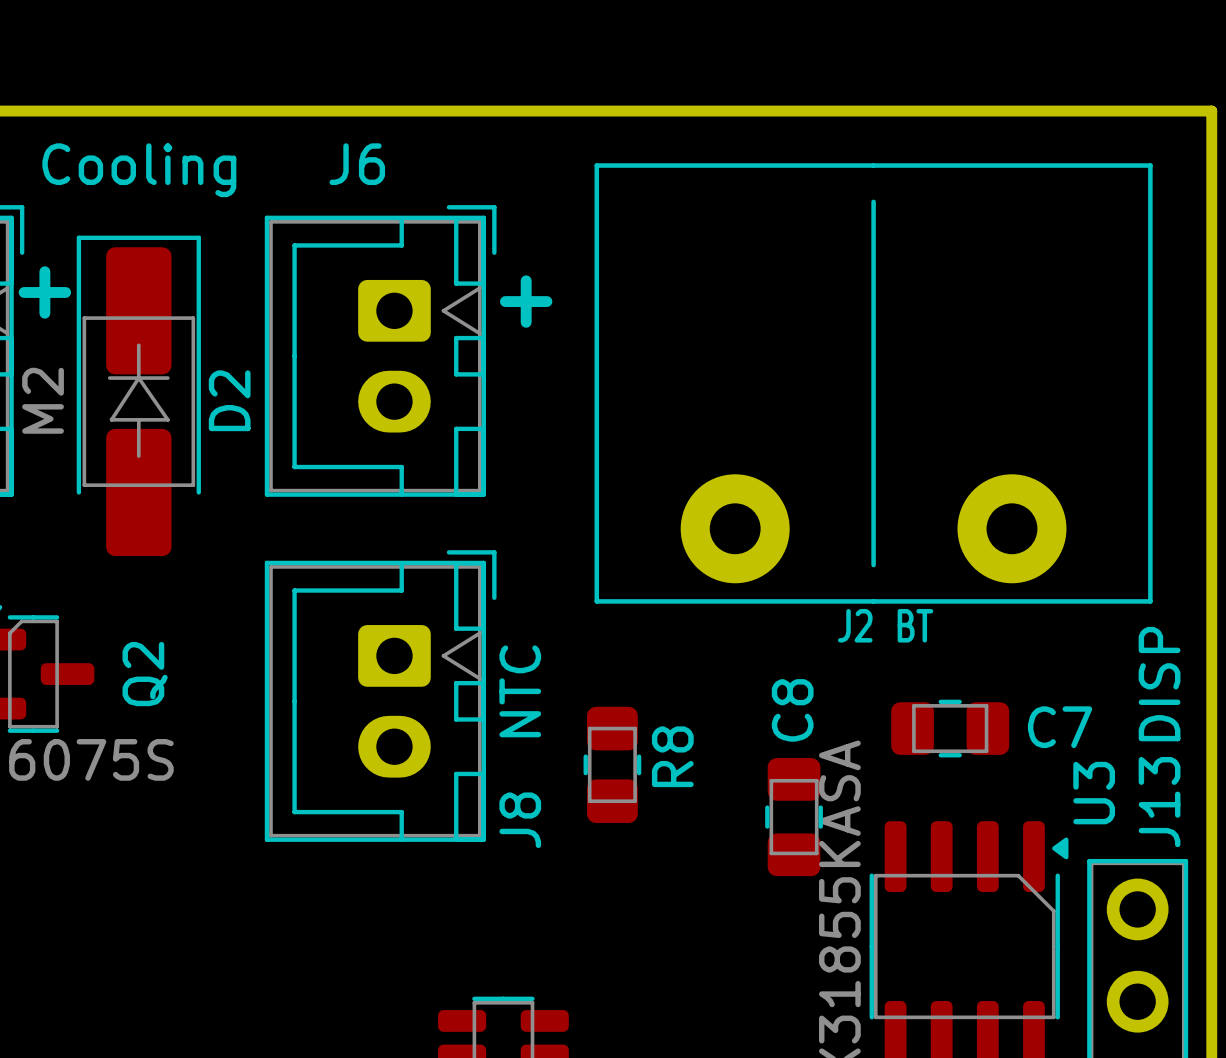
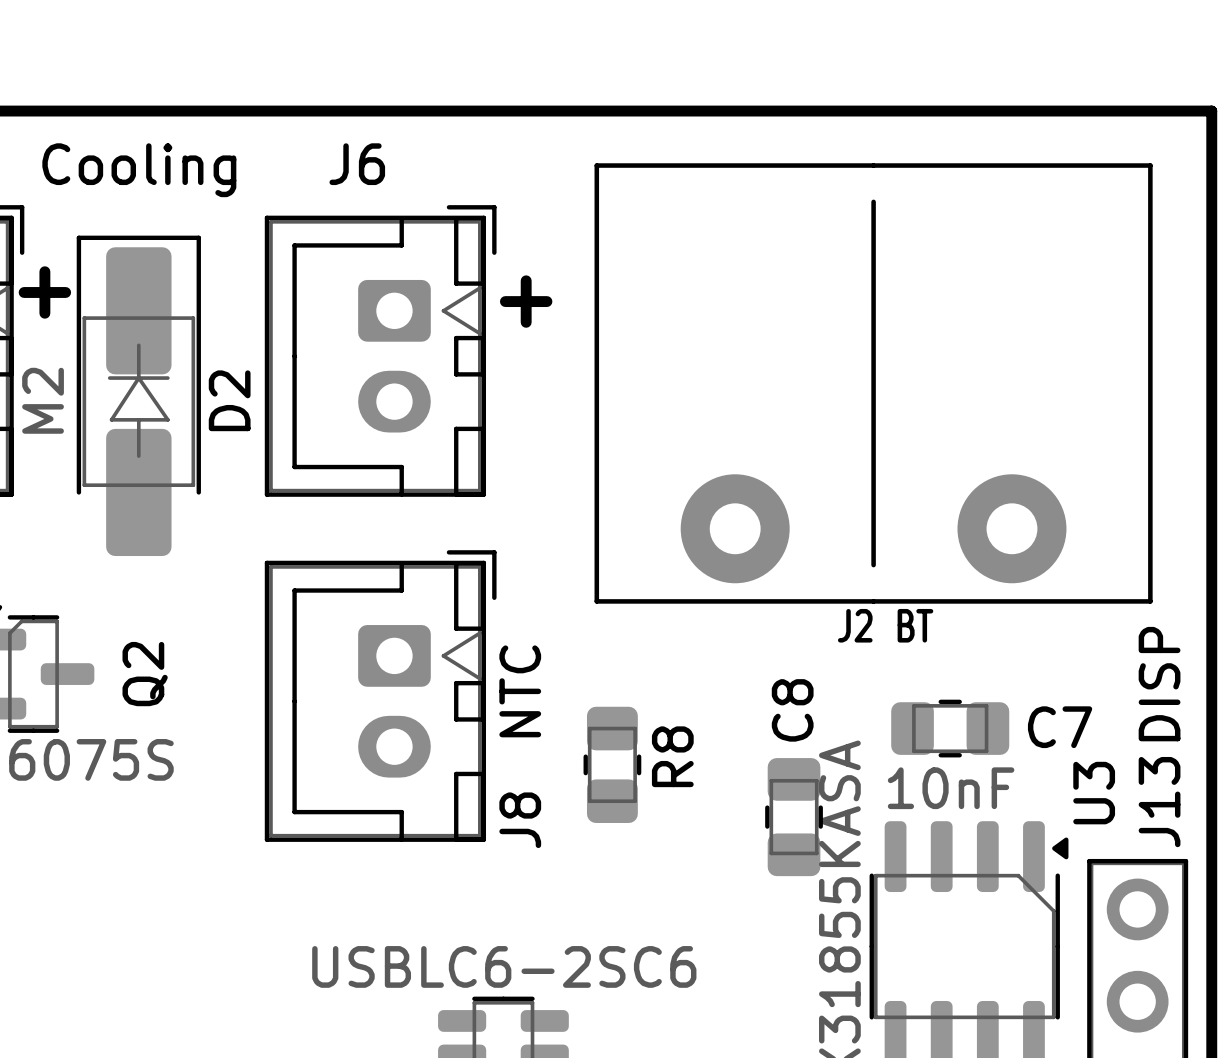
C7 value: none -> 10nF (951, 788)
part value: none -> USBLC6-2SC6 (504, 966)

